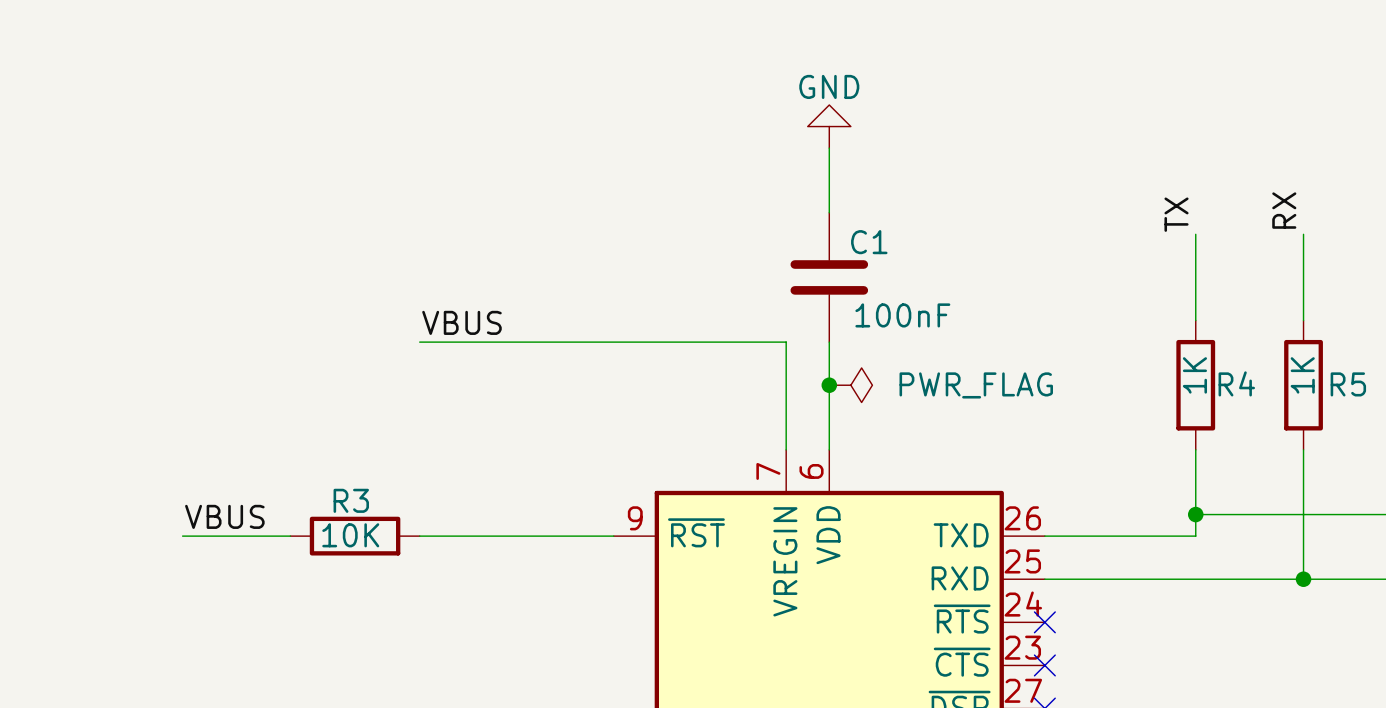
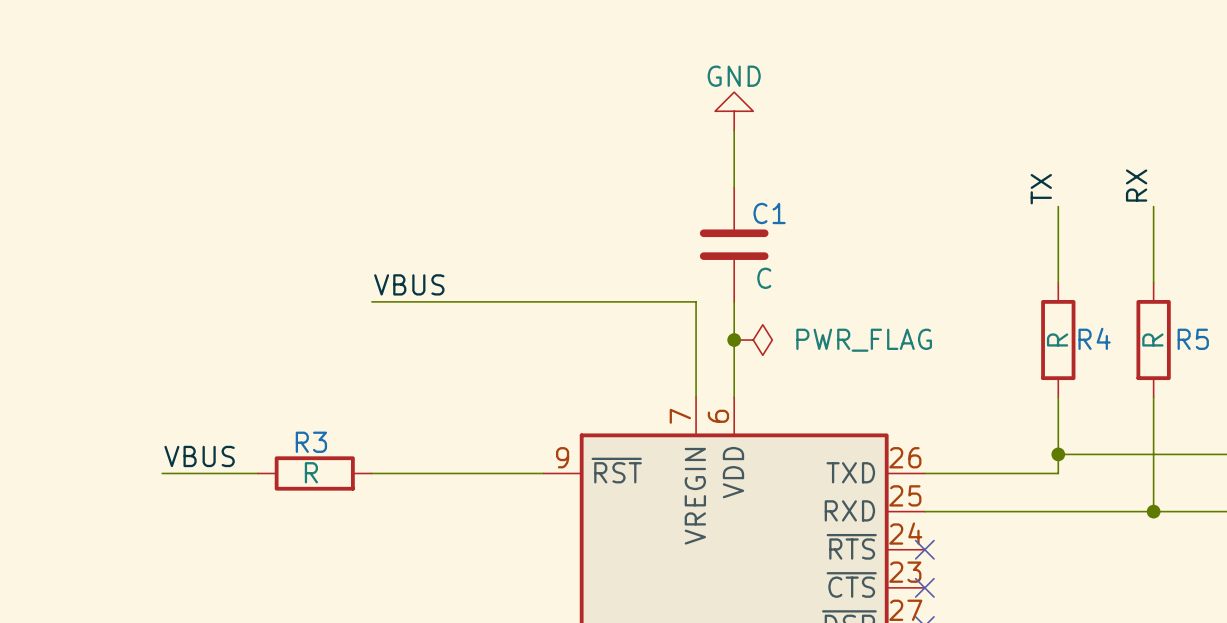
C1 value: 100nF (902, 315) -> C (764, 278)
R4 value: 1K (1194, 375) -> R (1057, 339)
R5 value: 1K (1302, 375) -> R (1152, 339)
R3 value: 10K (350, 535) -> R (311, 472)

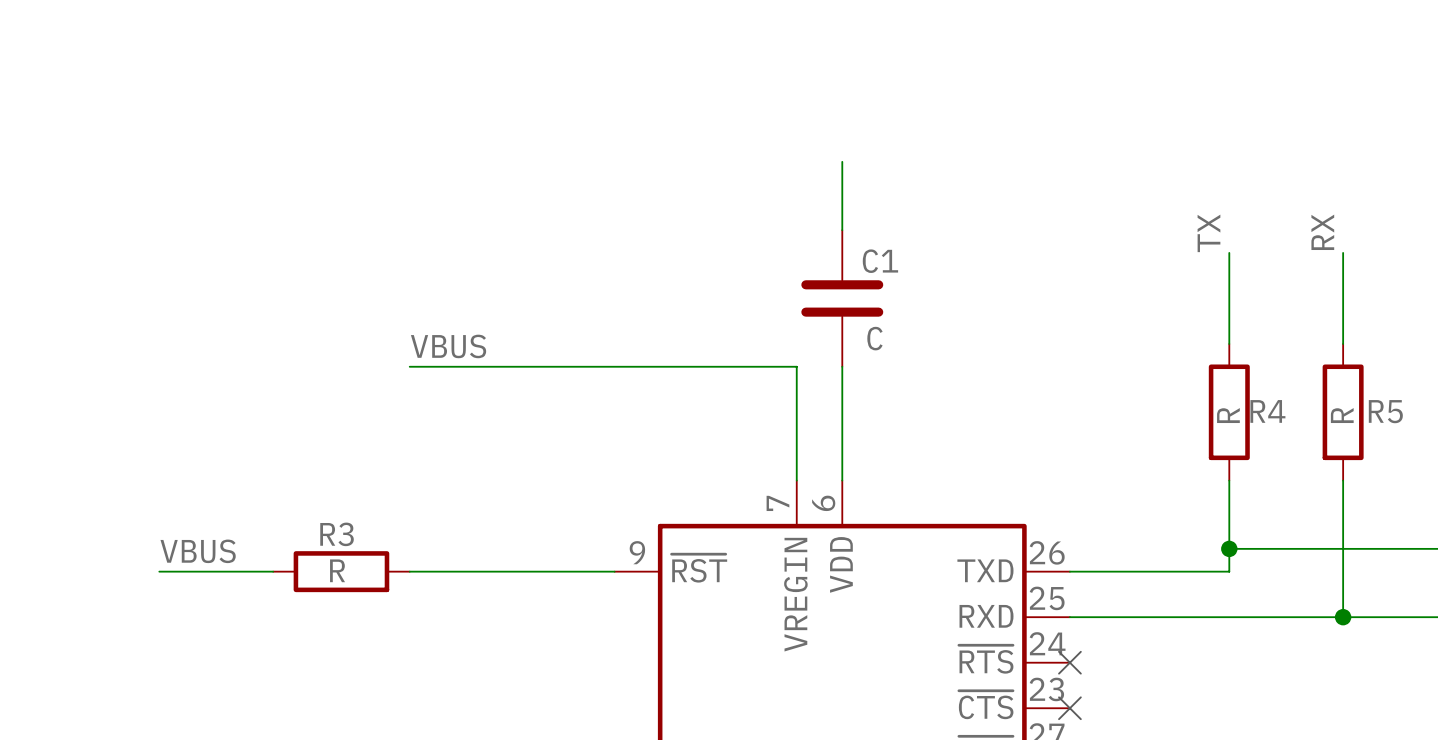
power symbol: GND (734, 111) -> none
junction: (734, 340) -> none
power symbol: PWR_FLAG (753, 340) -> none

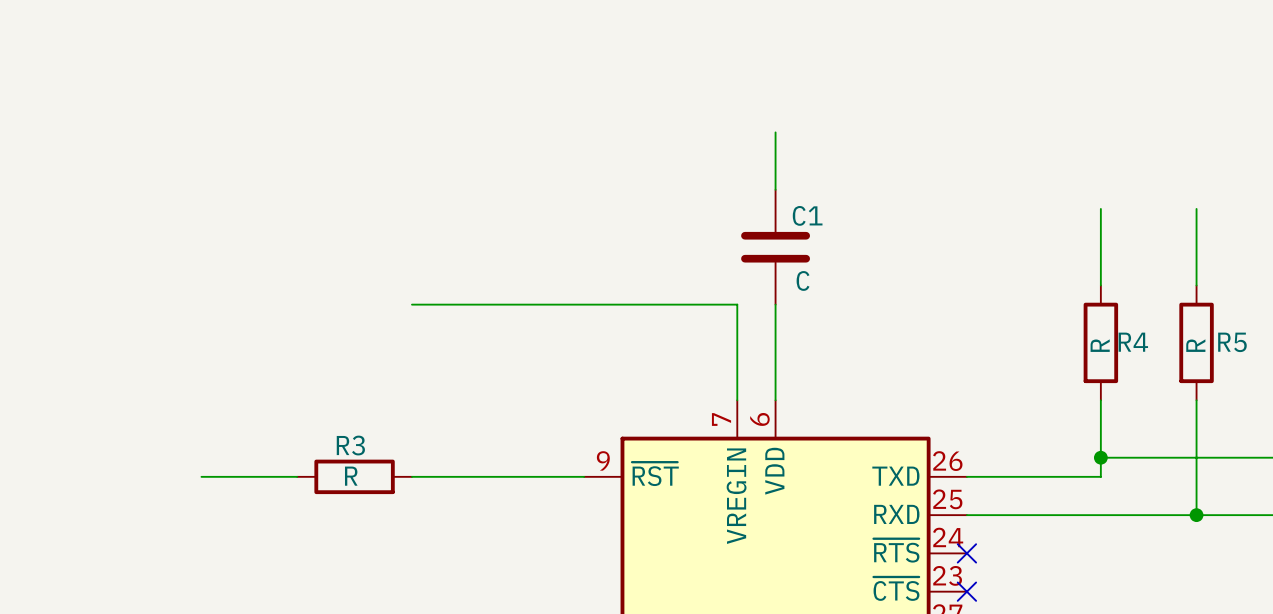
label: RX (1322, 232) -> none
label: TX (1208, 233) -> none
label: VBUS (448, 346) -> none
label: VBUS (198, 551) -> none

